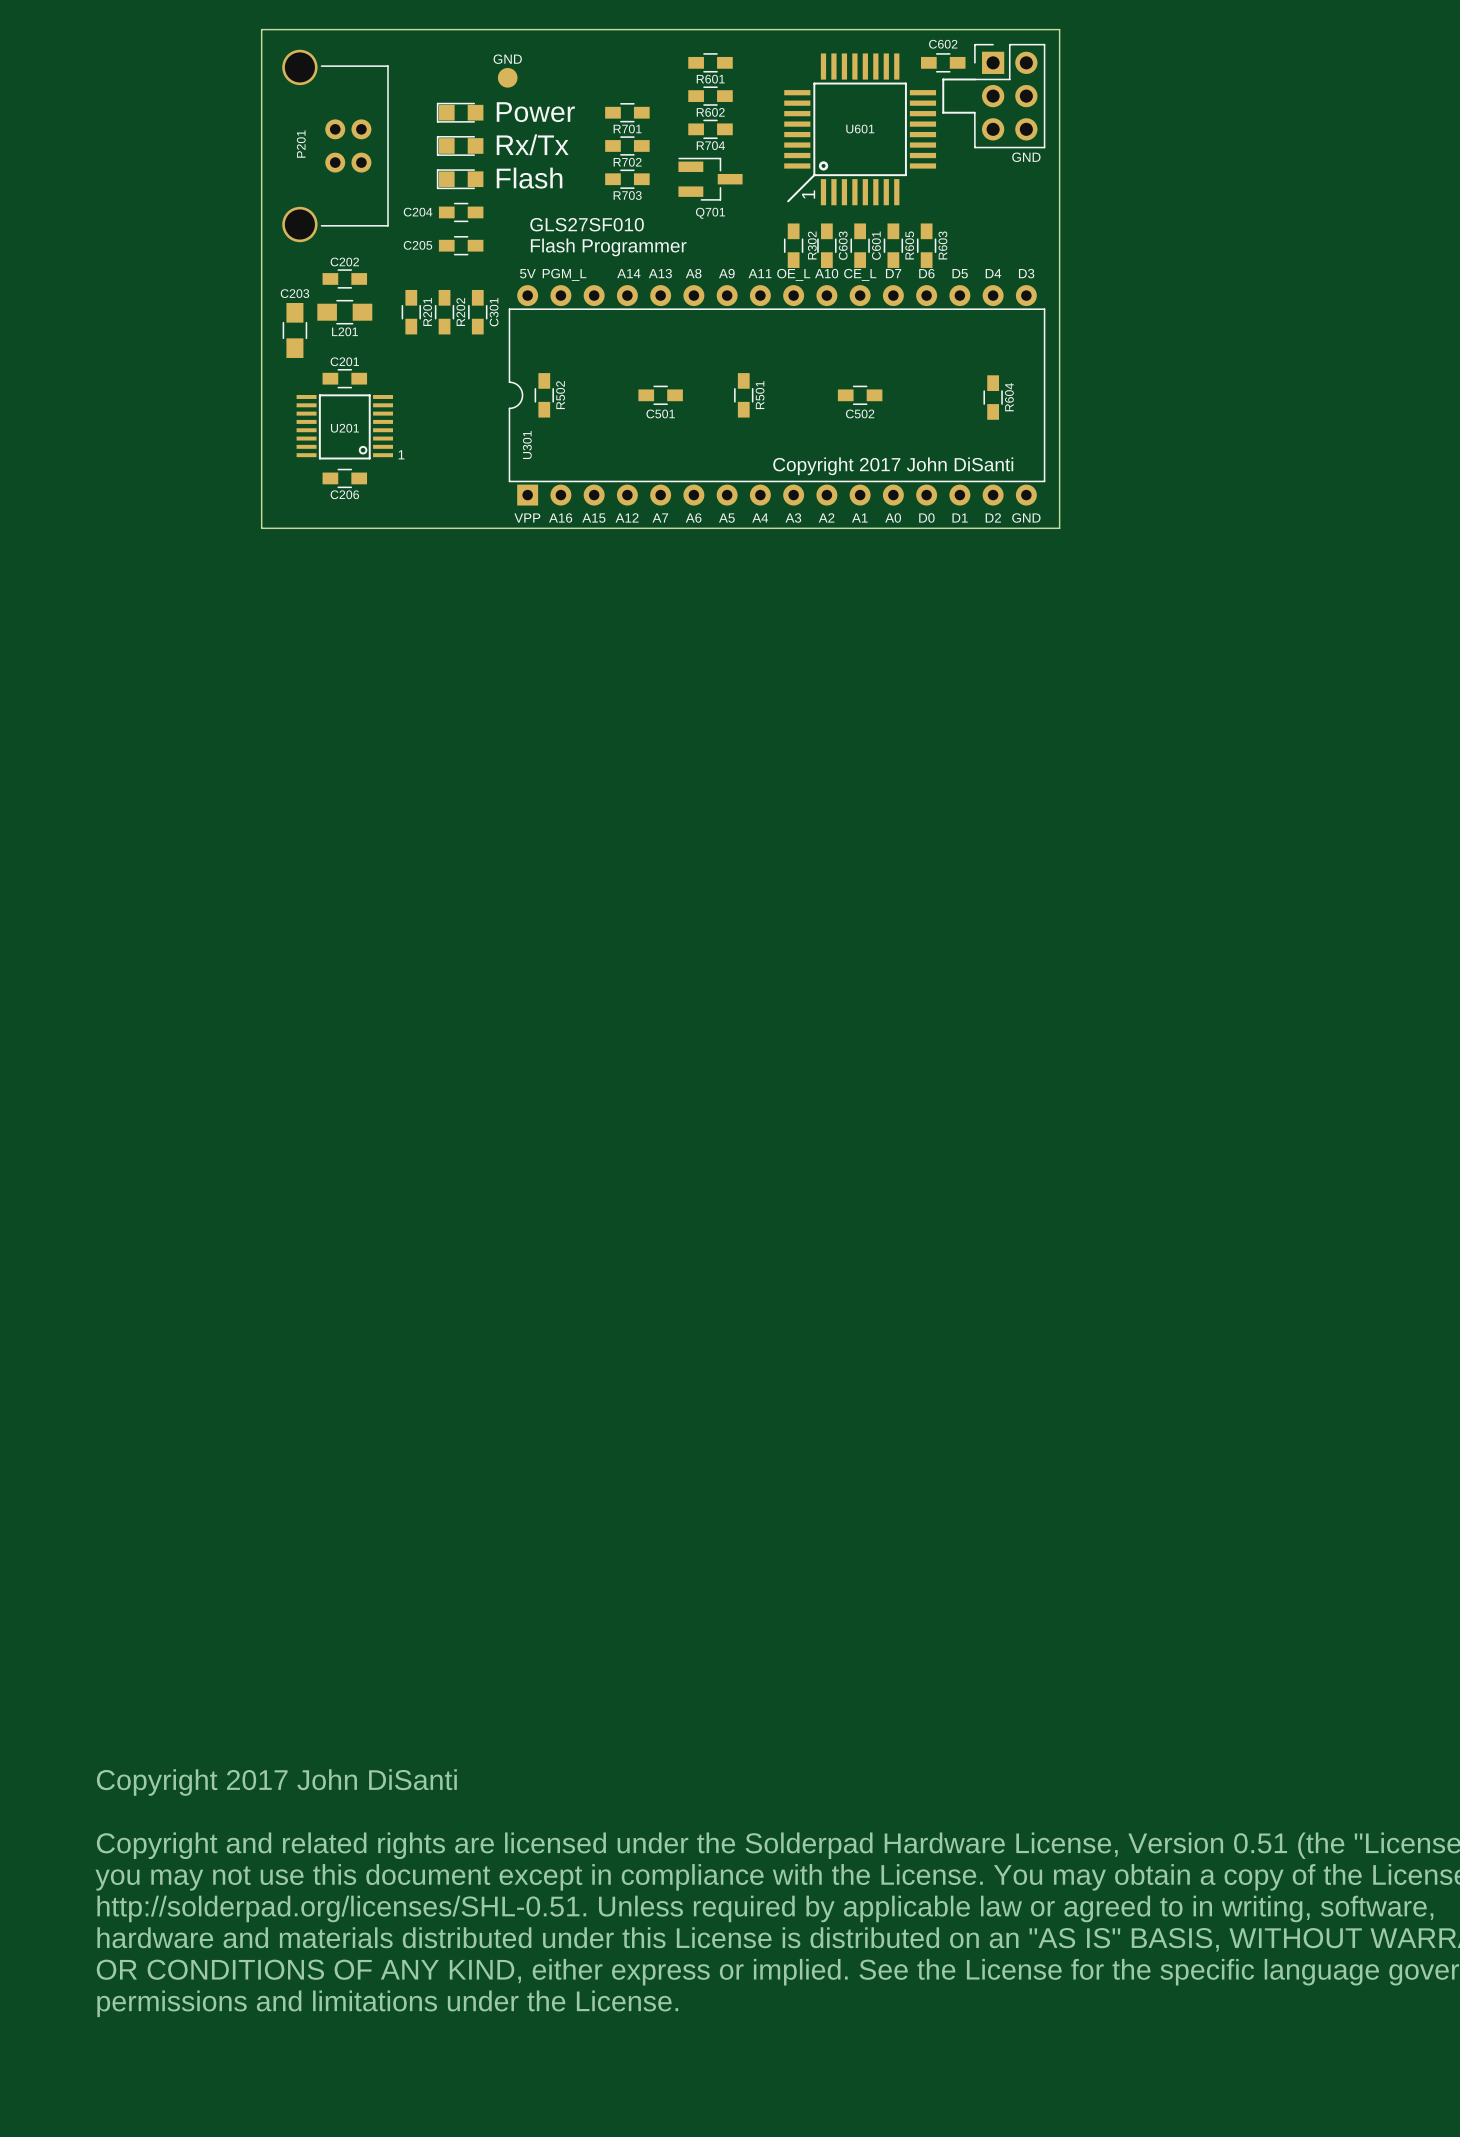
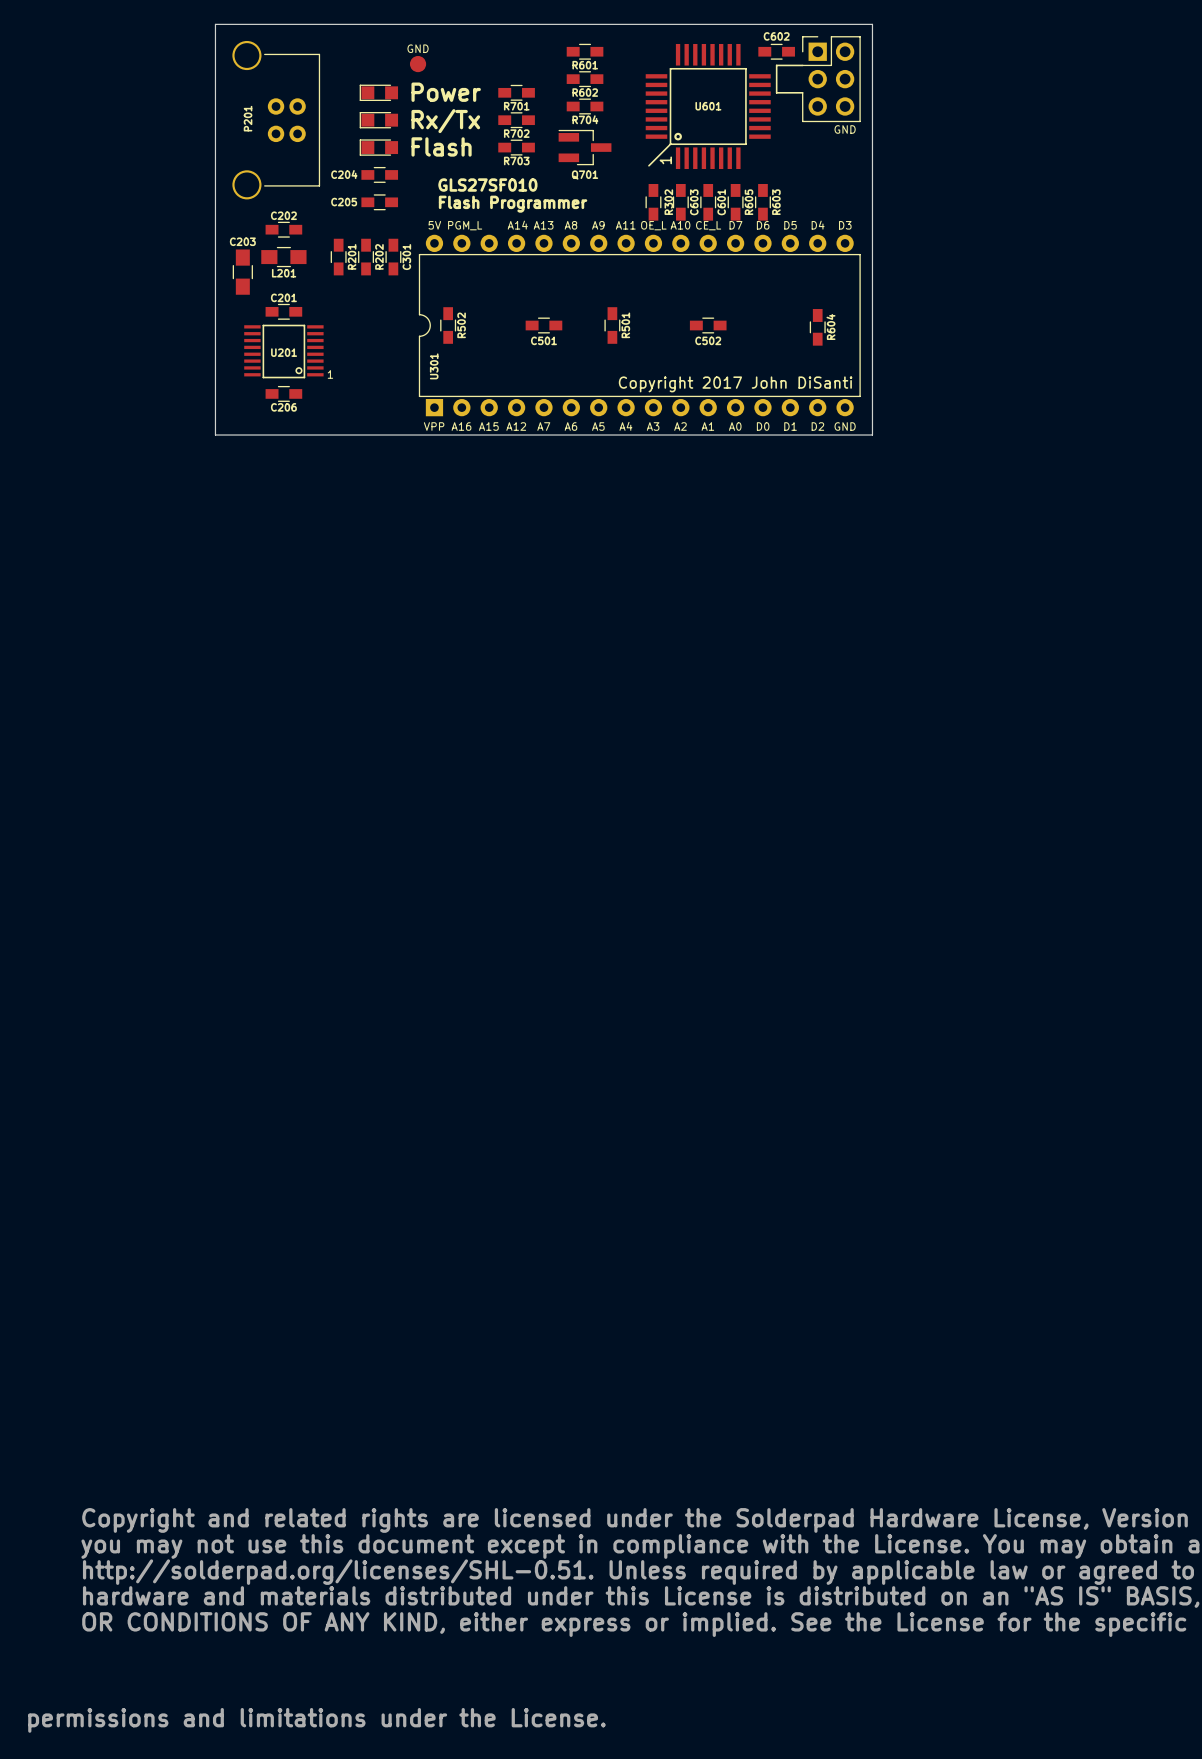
text: Copyright 2017 John DiSanti (276, 1782) -> none
text position: permissions and limitations under the License. (387, 2003) -> permissions and limitations under the License. (316, 1720)

